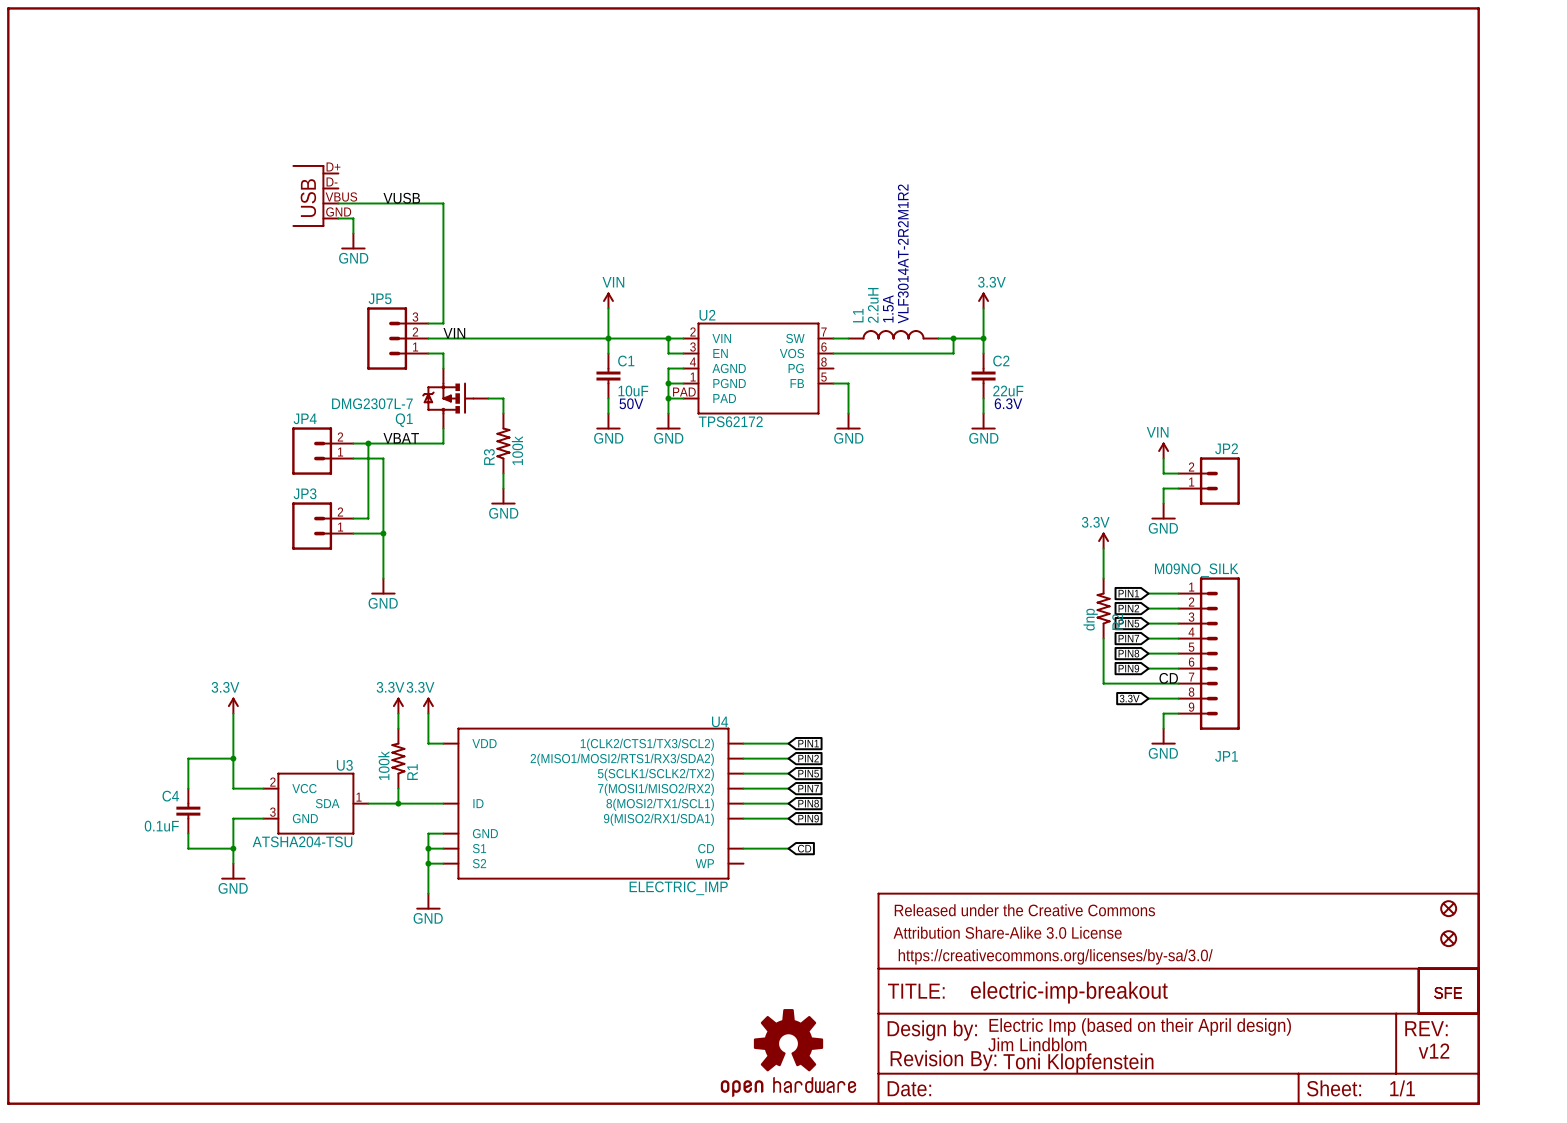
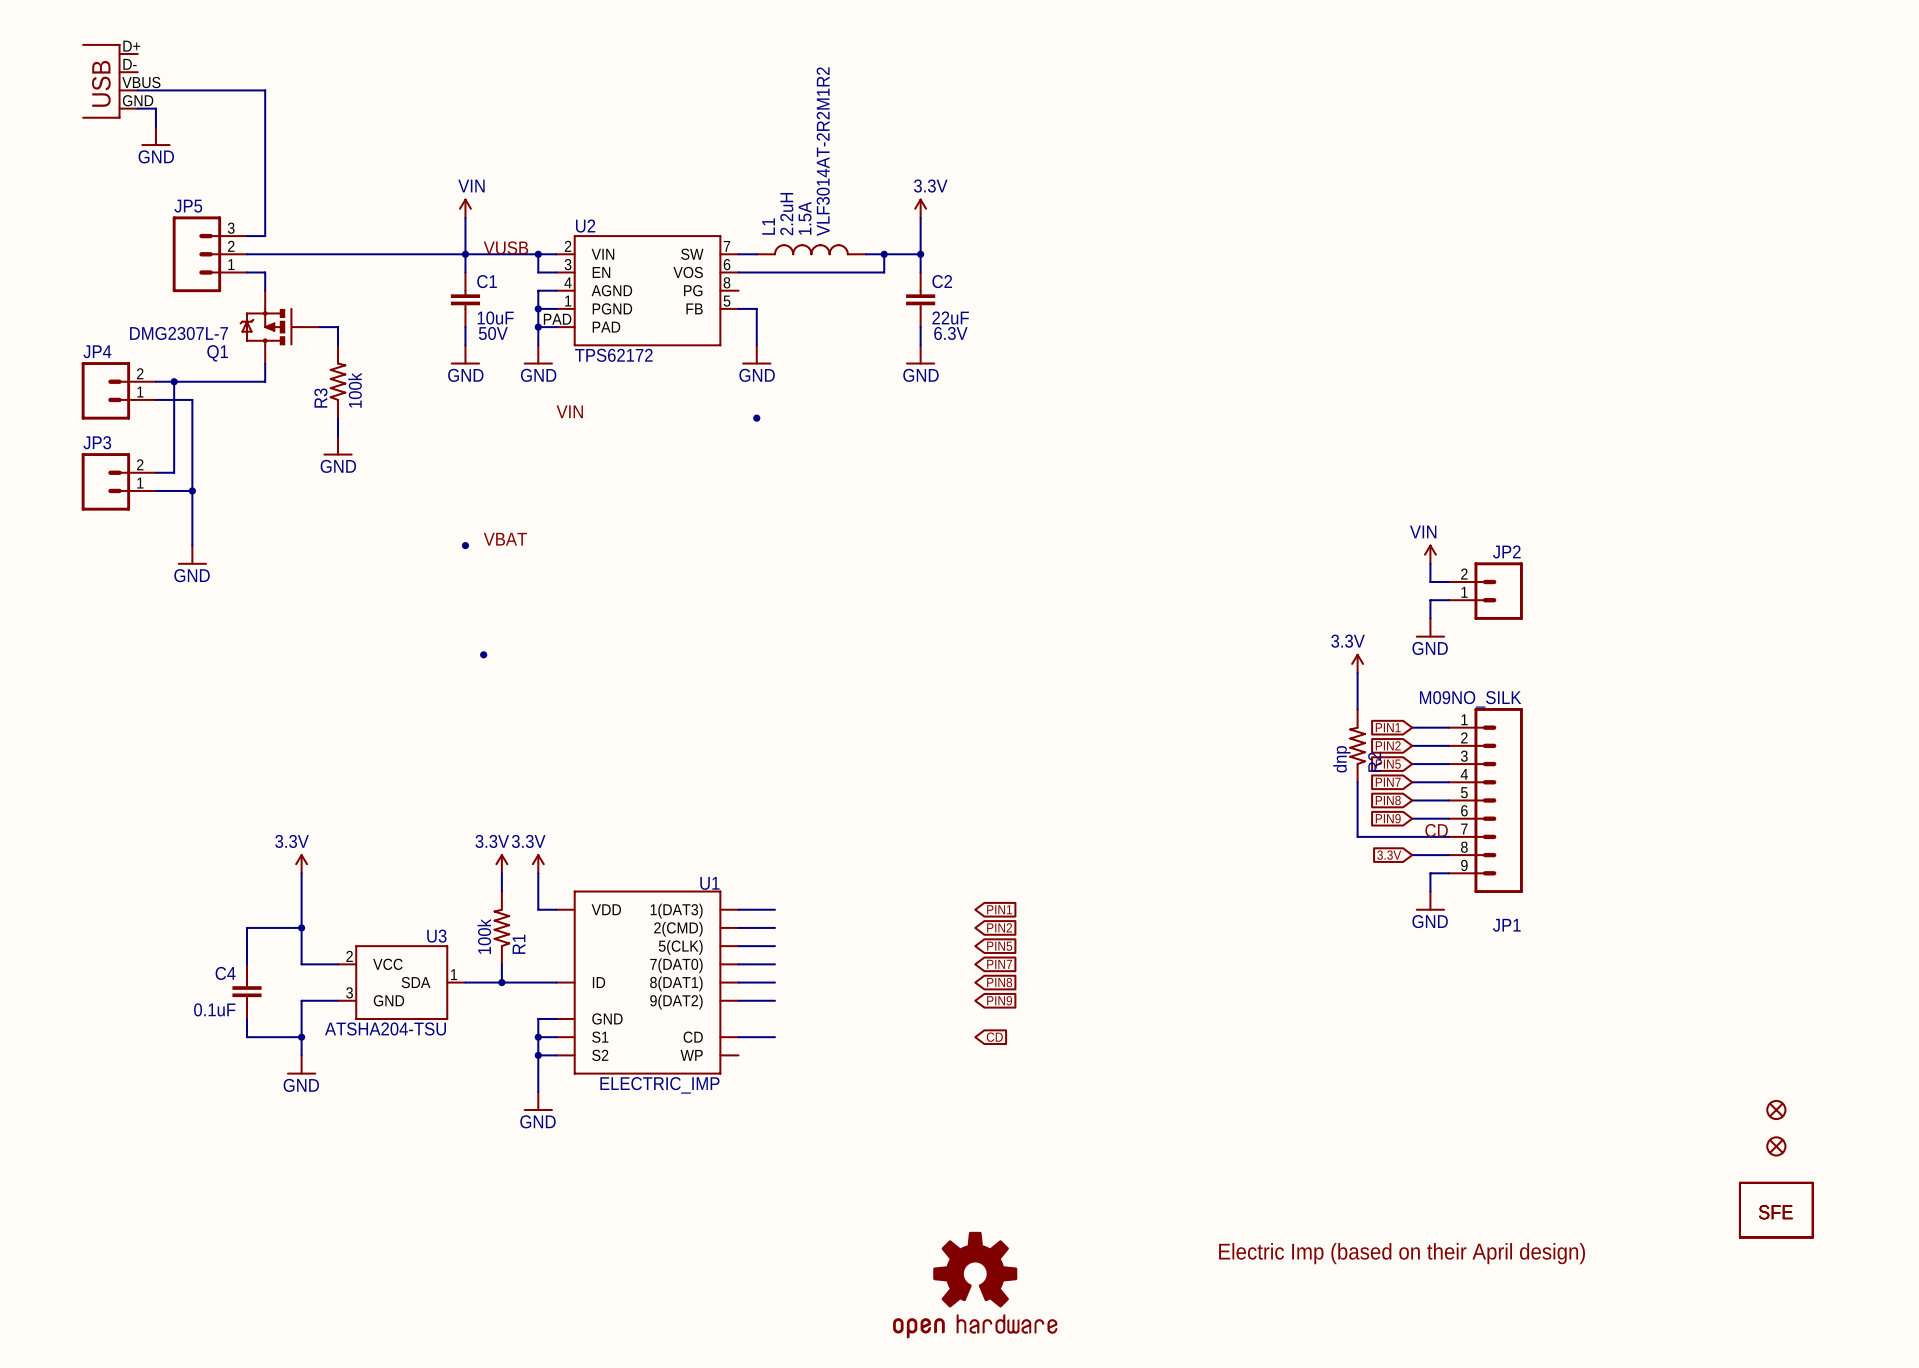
part: none -> (109, 81)
wire: none -> (137, 90) (265, 90) (265, 236) (246, 236)
wire: none -> (137, 108) (155, 108) (155, 126)
power symbol: none -> GND (155, 136)
text: none -> VLF3014AT-2R2M1R2 (823, 151)
power symbol: none -> VIN (465, 208)
power symbol: none -> 3.3V (920, 208)
wire: none -> (465, 217) (465, 272)
text: none -> 1.5A (805, 218)
wire: none -> (920, 217) (920, 272)
part: (315, 195) -> none
wire: none -> (246, 254) (429, 254)
junction: none -> (465, 254)
wire: none -> (538, 254) (538, 272) (556, 272)
junction: none -> (538, 254)
wire: (443, 203) (443, 323) (428, 323) -> none
wire: none -> (738, 254) (756, 254)
wire: none -> (866, 254) (920, 254)
wire: none -> (884, 254) (884, 272) (738, 272)
junction: none -> (884, 254)
junction: none -> (920, 254)
wire: none -> (246, 272) (265, 272) (265, 290)
wire: (338, 218) (353, 218) (353, 233) -> (319, 327) (338, 327) (338, 345)
wire: none -> (556, 290) (538, 290) (538, 345)
power symbol: GND (353, 241) -> none
wire: none -> (538, 308) (556, 308)
junction: none -> (538, 308)
wire: none -> (738, 308) (756, 308) (756, 345)
text: VLF3014AT-2R2M1R2 (903, 253) -> none
wire: none -> (465, 327) (465, 345)
wire: none -> (538, 327) (556, 327)
junction: none -> (538, 327)
wire: none -> (920, 327) (920, 345)
text: none -> 50V (493, 333)
text: none -> 6.3V (950, 333)
power symbol: none -> GND (465, 354)
power symbol: none -> GND (538, 354)
power symbol: none -> GND (756, 354)
power symbol: none -> GND (920, 354)
wire: none -> (265, 363) (265, 381) (155, 381)
power symbol: VIN (608, 300) -> none
power symbol: 3.3V (983, 300) -> none
wire: none -> (174, 381) (174, 472) (155, 472)
junction: none -> (174, 381)
wire: (608, 308) (608, 353) -> none
text: 1.5A (888, 308) -> none
wire: (983, 308) (983, 353) -> none
wire: none -> (155, 399) (192, 399) (192, 545)
L1 position: (893, 334) -> (811, 249)
wire: none -> (338, 418) (338, 436)
JP5 position: (397, 338) -> (209, 254)
wire: (428, 338) (683, 338) -> none
wire: (668, 338) (668, 353) (683, 353) -> none
junction: (668, 338) -> none
wire: (833, 338) (848, 338) -> none
wire: (938, 338) (983, 338) -> none
wire: (953, 338) (953, 353) (833, 353) -> none
junction: (953, 338) -> none
junction: (983, 338) -> none
wire: (428, 353) (443, 353) (443, 368) -> none
power symbol: none -> GND (338, 445)
wire: (683, 368) (668, 368) (668, 413) -> none
U2 position: (758, 368) -> (647, 290)
C1 position: (608, 376) -> (465, 299)
C2 position: (983, 376) -> (920, 299)
wire: (668, 383) (683, 383) -> none
junction: (668, 383) -> none
wire: (833, 383) (848, 383) (848, 413) -> none
wire: none -> (155, 490) (192, 490)
junction: none -> (192, 490)
Q1 position: (455, 398) -> (279, 327)
wire: (488, 398) (503, 398) (503, 413) -> none
wire: (608, 398) (608, 413) -> none
wire: (668, 398) (683, 398) -> none
junction: (668, 398) -> none
wire: (983, 398) (983, 413) -> none
text: 50V (631, 403) -> none
text: 6.3V (1008, 403) -> none
power symbol: GND (608, 421) -> none
power symbol: GND (668, 421) -> none
power symbol: GND (848, 421) -> none
power symbol: GND (983, 421) -> none
wire: (443, 428) (443, 443) (353, 443) -> none
wire: (368, 443) (368, 518) (353, 518) -> none
R3 position: (503, 443) -> (338, 381)
power symbol: none -> GND (192, 555)
JP4 position: (322, 451) -> (118, 390)
wire: (353, 458) (383, 458) (383, 578) -> none
wire: (503, 473) (503, 488) -> none
power symbol: GND (503, 496) -> none
JP3 position: (322, 526) -> (118, 481)
wire: (353, 533) (383, 533) -> none
part: (743, 556) -> none
power symbol: GND (383, 586) -> none
wire: none -> (738, 909) (774, 909)
wire: (743, 743) (788, 743) -> none
wire: none -> (738, 927) (774, 927)
wire: (743, 758) (788, 758) -> none
wire: none -> (738, 946) (774, 946)
wire: (743, 773) (788, 773) -> none
wire: none -> (738, 964) (774, 964)
wire: (743, 788) (788, 788) -> none
U1: none -> ELECTRIC_IMP (647, 982)
wire: none -> (738, 982) (774, 982)
U4: ELECTRIC_IMP (593, 803) -> none
wire: (743, 803) (788, 803) -> none
wire: none -> (738, 1000) (774, 1000)
wire: (743, 818) (788, 818) -> none
wire: none -> (738, 1037) (774, 1037)
wire: (743, 848) (788, 848) -> none
part: (1178, 998) -> none
text: Jim Lindblom (1037, 1044) -> none
text: v12 (1434, 1051) -> none
part: (943, 1060) -> none
text: Toni Klopfenstein (1078, 1063) -> none

